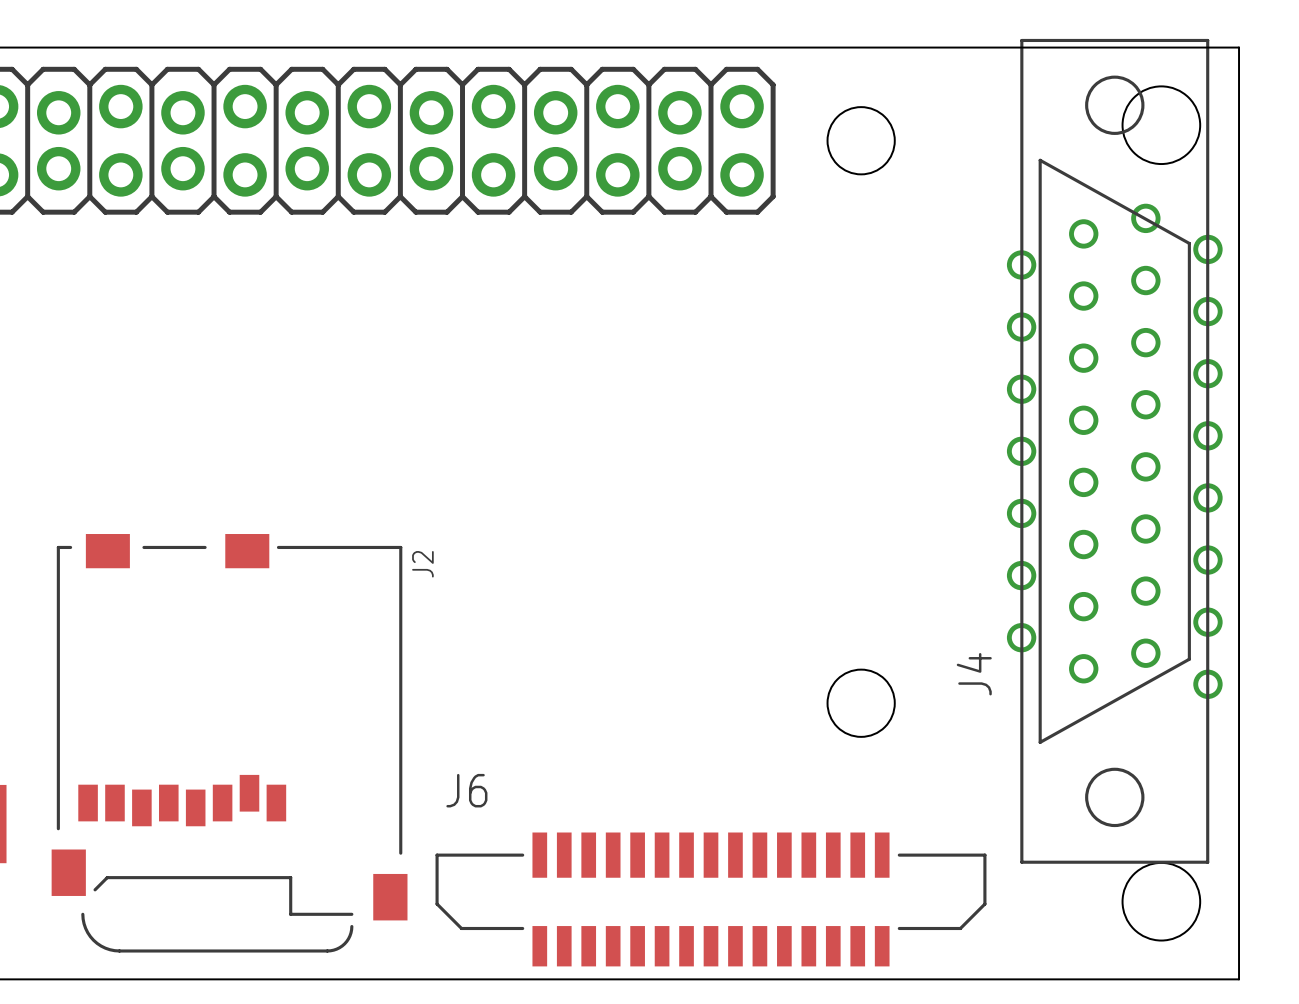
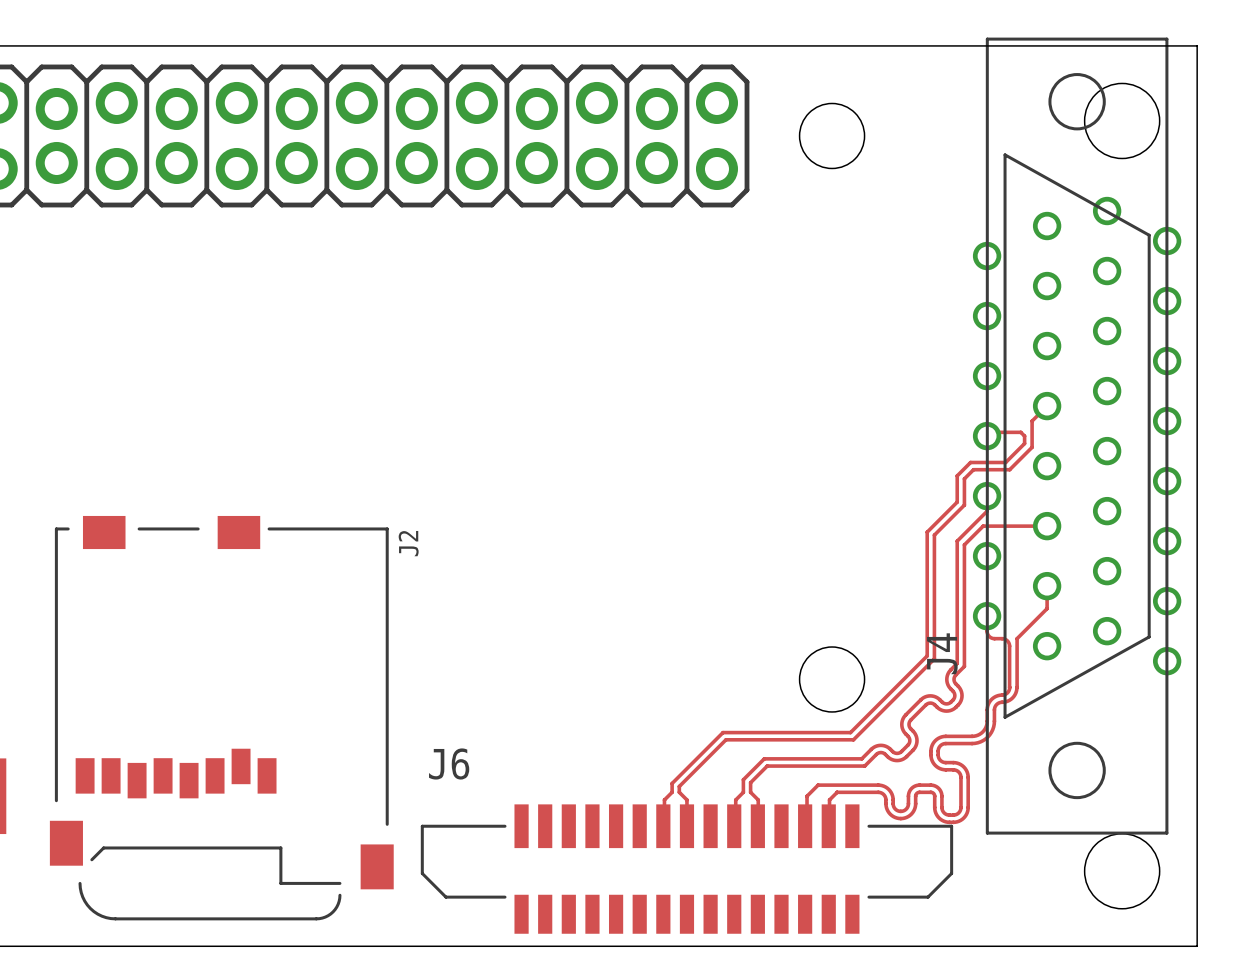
top track: none -> (1047, 406) (1032, 421) (1032, 447) (1009, 469) (973, 469) (964, 478) (964, 505) (934, 535) (934, 658) (853, 739) (725, 739) (679, 786) (679, 792) (686, 799) (686, 826)
top track: none -> (987, 436) (990, 432) (1020, 432) (1024, 436) (1024, 443) (1005, 462) (970, 462) (957, 475) (957, 502) (927, 532) (927, 655) (850, 732) (722, 732) (672, 783) (672, 792) (664, 799) (663, 826)
top track: none -> (987, 496) (987, 511) (957, 541) (957, 663) (948, 672) (946, 679) (948, 686) (954, 694) (953, 699) (946, 703) (932, 695) (920, 699) (902, 719) (902, 727) (909, 741) (898, 753) (880, 745) (872, 748) (861, 758) (764, 758) (743, 779) (743, 792) (735, 799) (734, 826)
top track: none -> (1047, 526) (983, 526) (964, 544) (964, 666) (954, 679) (961, 693) (958, 705) (946, 711) (939, 709) (932, 703) (925, 704) (909, 722) (909, 727) (916, 737) (915, 745) (906, 756) (900, 760) (891, 759) (880, 752) (864, 766) (767, 766) (750, 782) (750, 792) (758, 799) (757, 826)
top track: none -> (1047, 586) (1047, 608) (1017, 638) (1017, 687)
top track: none -> (987, 616) (988, 635) (992, 638) (1004, 639) (1009, 644) (1009, 687)
top track: none -> (1009, 687) (1006, 693) (994, 697) (989, 702) (986, 725) (981, 733) (974, 736) (941, 736) (935, 740) (932, 745) (931, 756) (935, 765) (941, 769) (956, 770) (960, 774) (960, 807) (957, 813) (948, 815) (943, 812) (941, 791) (933, 785) (918, 785) (912, 787) (908, 793) (907, 807) (900, 811) (894, 807) (890, 790) (882, 785) (818, 785) (807, 796) (807, 824) (805, 826)
top track: none -> (1016, 687) (1015, 693) (1011, 699) (995, 706) (993, 726) (985, 738) (974, 743) (943, 743) (938, 748) (938, 755) (941, 761) (959, 763) (963, 766) (967, 773) (968, 809) (966, 814) (960, 820) (947, 822) (939, 817) (934, 809) (934, 795) (931, 792) (917, 793) (913, 811) (908, 816) (900, 818) (895, 817) (889, 812) (885, 797) (881, 792) (837, 792)
top track: none -> (837, 792) (829, 799) (828, 826)

